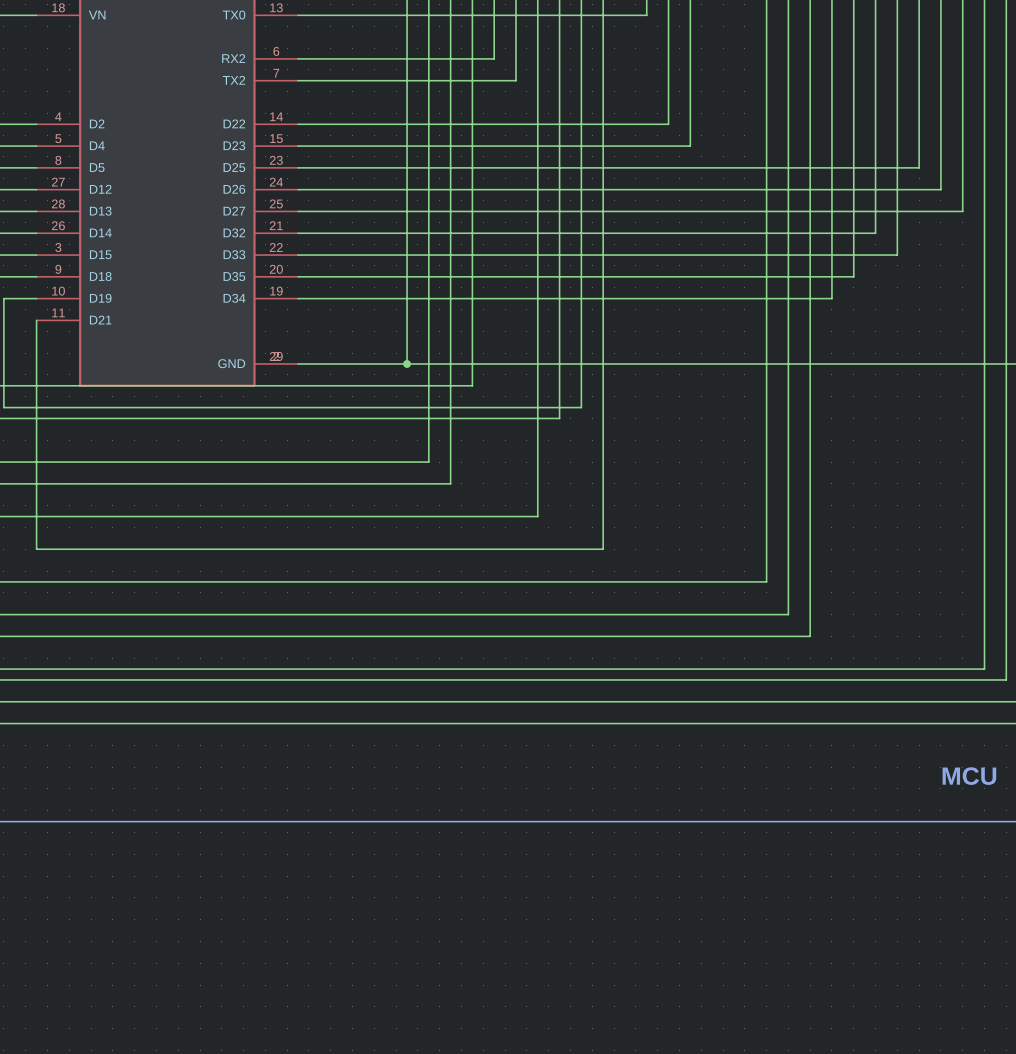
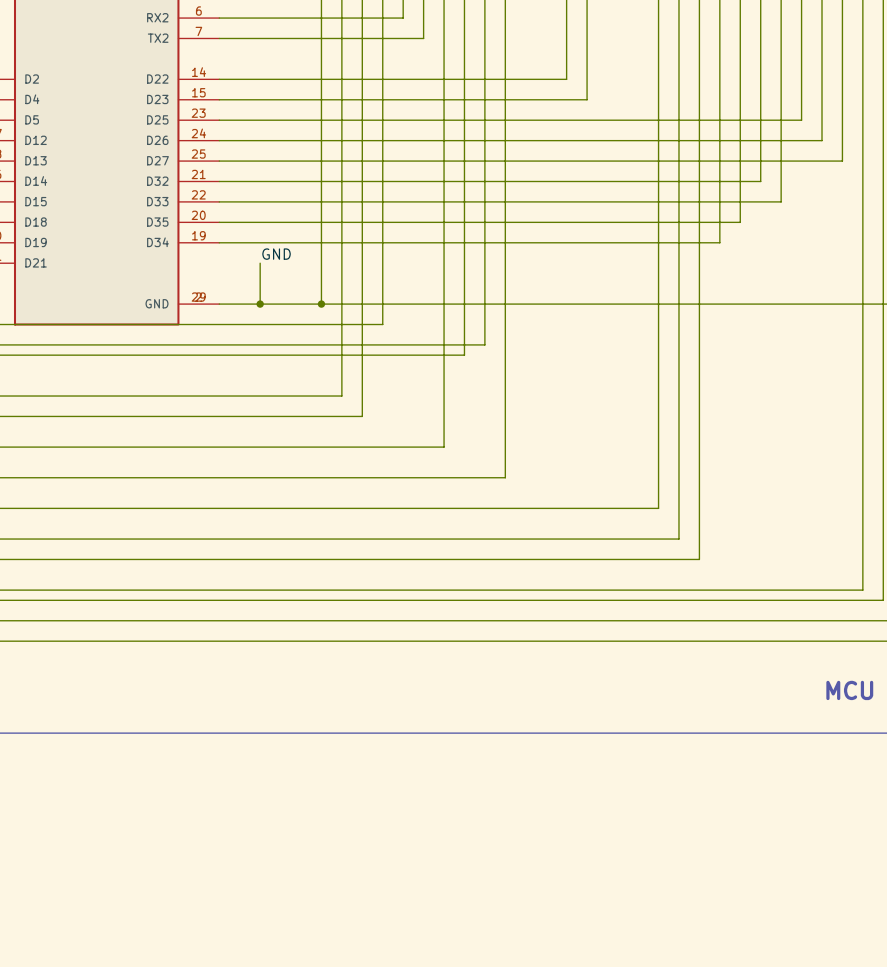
label: none -> GND (276, 254)
wire: none -> (260, 263) (260, 304)
junction: none -> (260, 304)

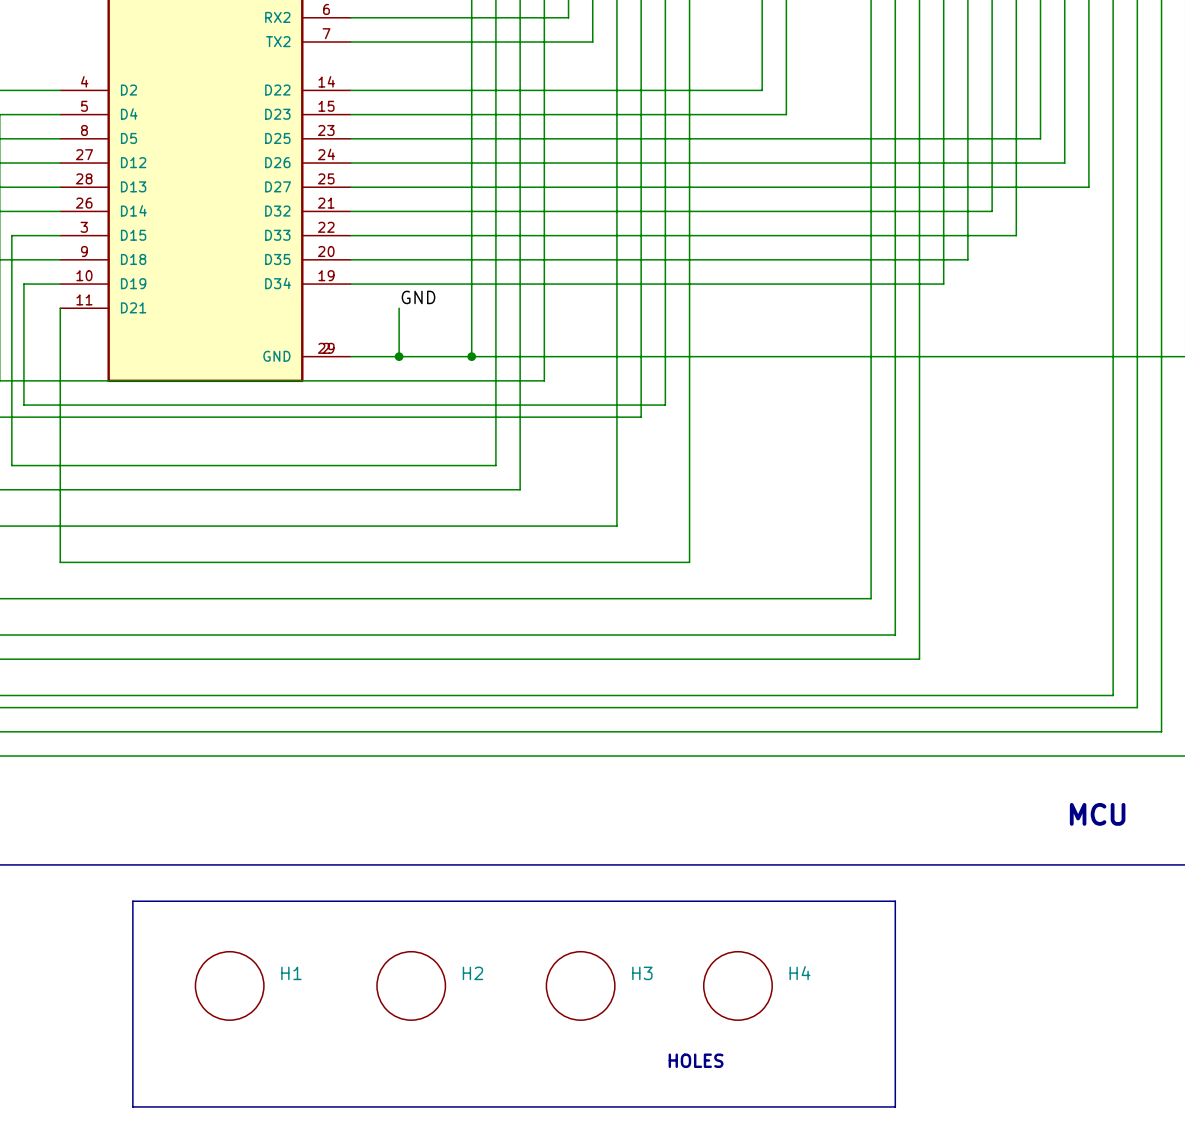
line: none -> (132, 901) (895, 901) (895, 1106) (132, 1106) (132, 901)
H1: none -> (229, 985)
H2: none -> (411, 985)
H3: none -> (580, 985)
H4: none -> (737, 985)
text: none -> HOLES (696, 1060)

